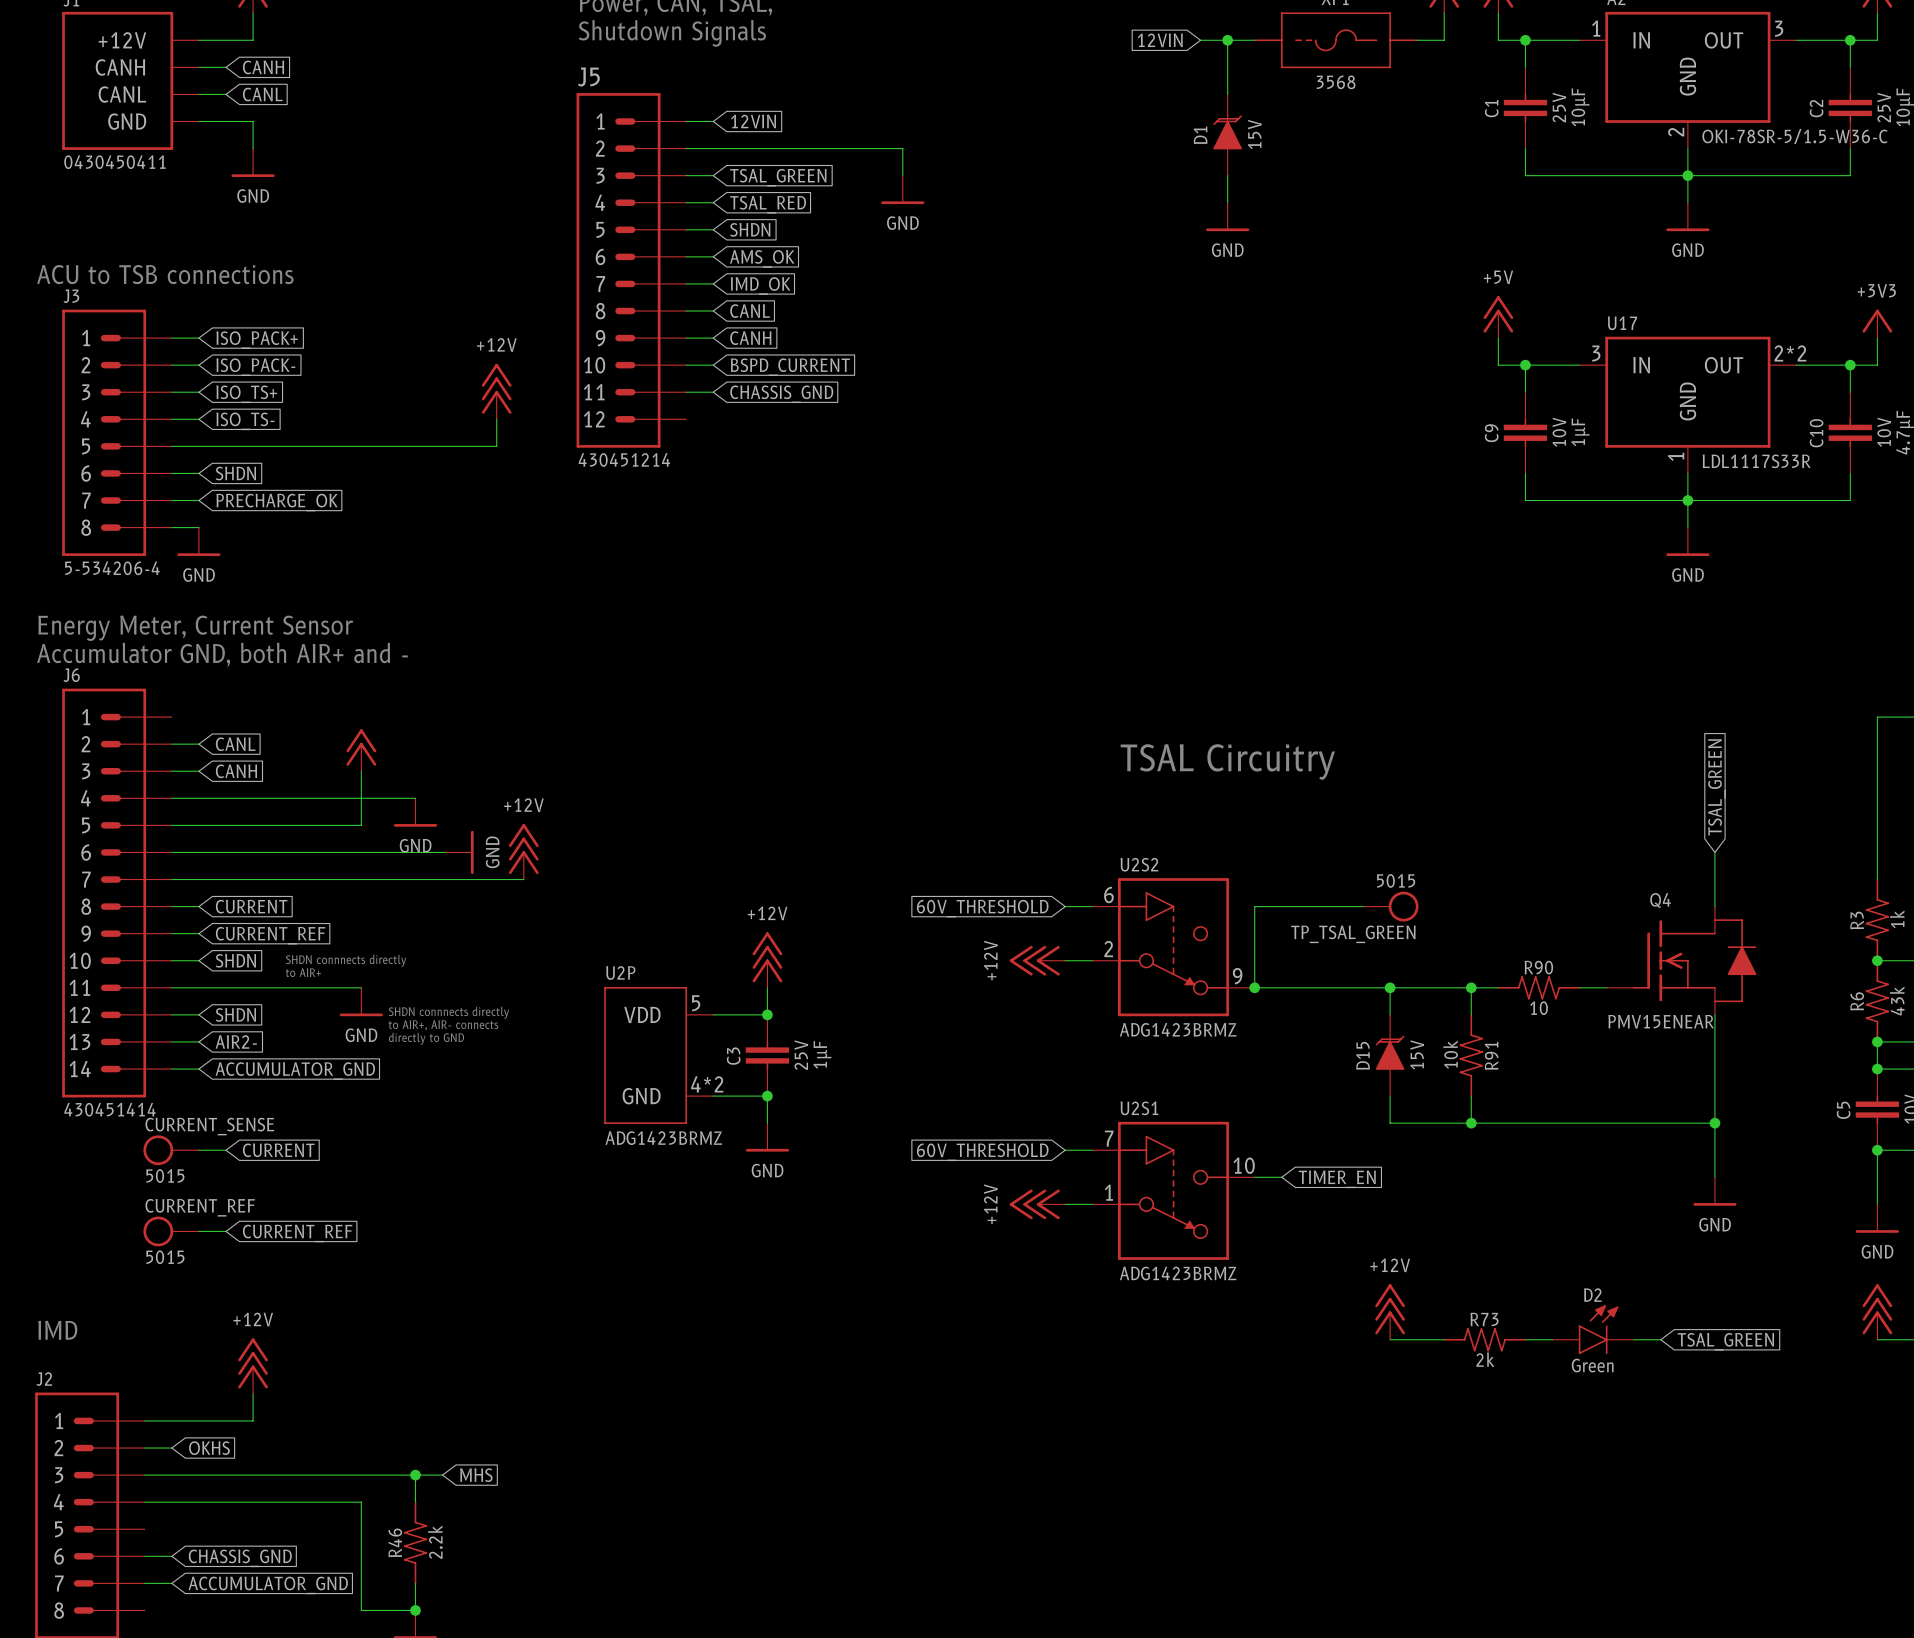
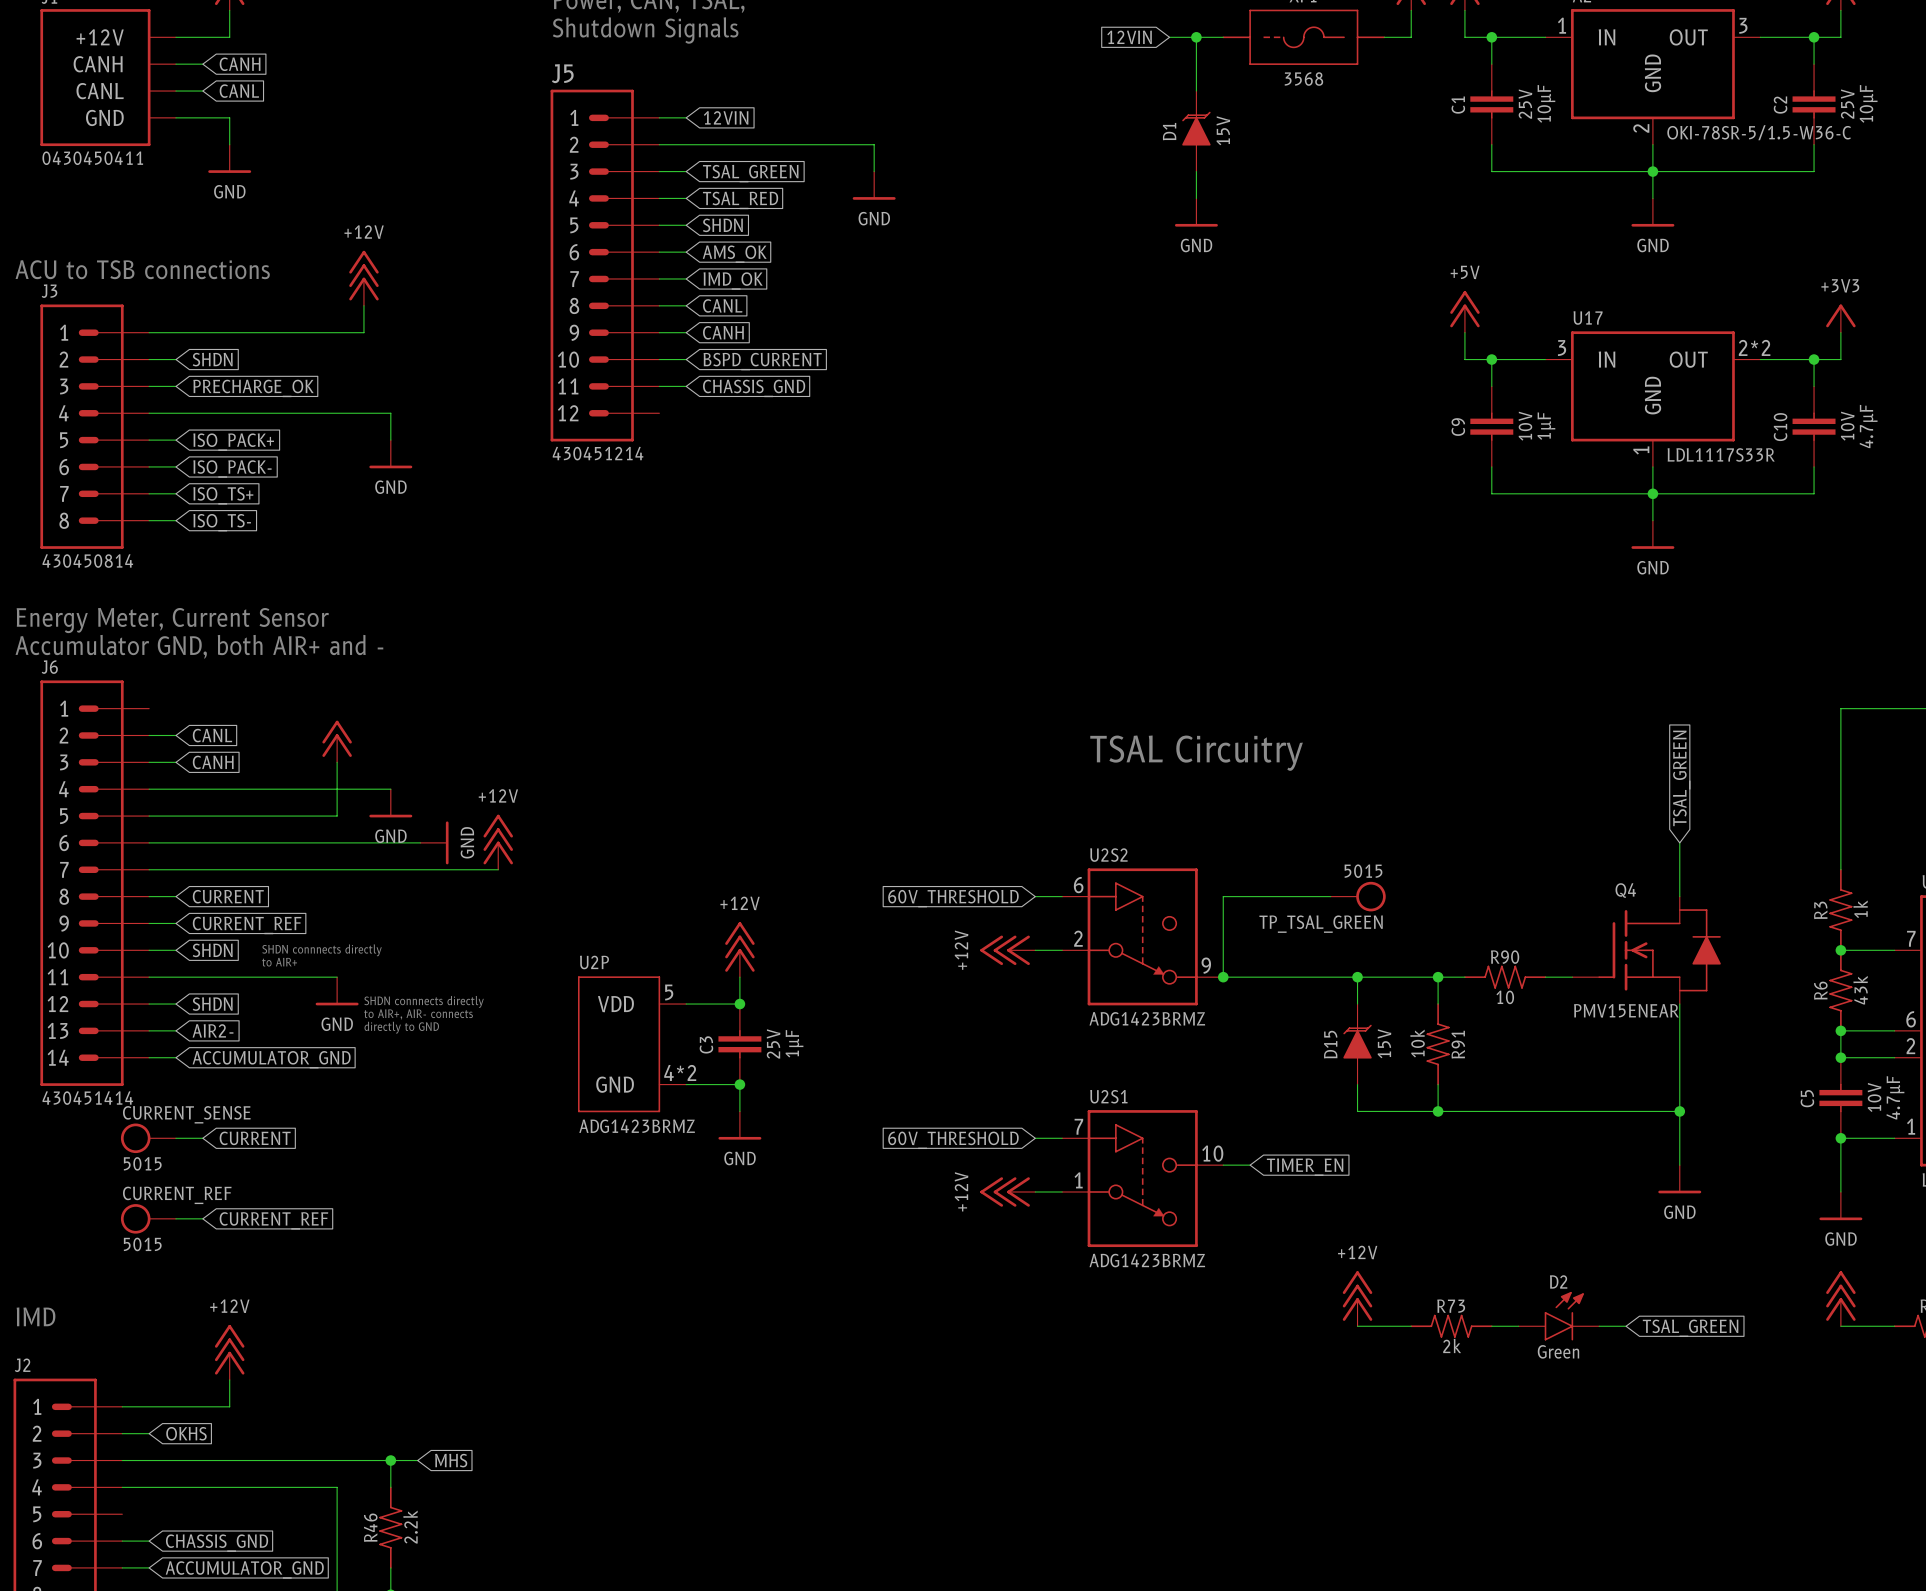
wire: none -> (363, 305) (363, 332) (175, 332)
global label position: ISO_PACK+ (257, 340) -> ISO_PACK+ (233, 442)
global label: ISO_PACK- (255, 367) -> SHDN (212, 359)
power symbol position: +12V (496, 391) -> +12V (363, 278)
global label: ISO_TS+ (246, 394) -> PRECHARGE_OK (253, 388)
wire: none -> (175, 413) (390, 413) (390, 440)
wire: (496, 419) (496, 446) (198, 446) -> none
global label position: ISO_TS- (245, 421) -> ISO_TS- (222, 522)
global label: SHDN (235, 473) -> ISO_PACK- (232, 468)
global label: PRECHARGE_OK (277, 502) -> ISO_TS+ (223, 495)
power symbol position: GND (198, 541) -> GND (390, 454)
J3 text: 5-534206-4 (112, 568) -> 430450814 (87, 561)

